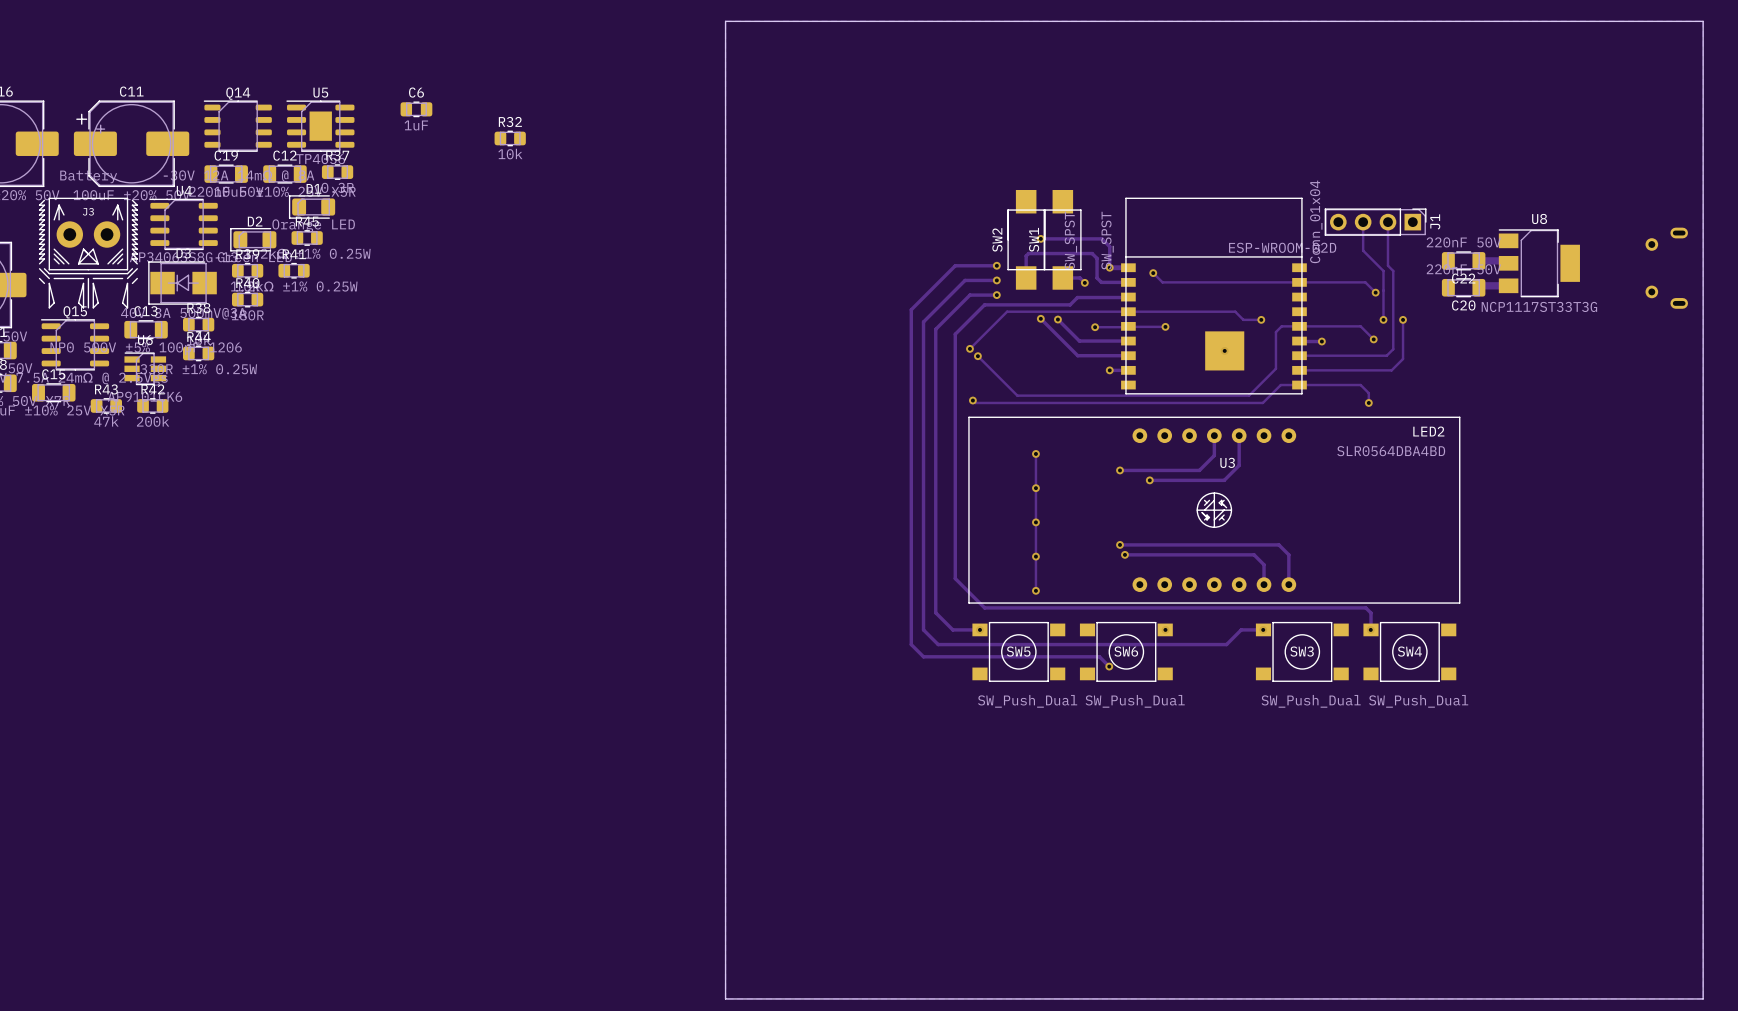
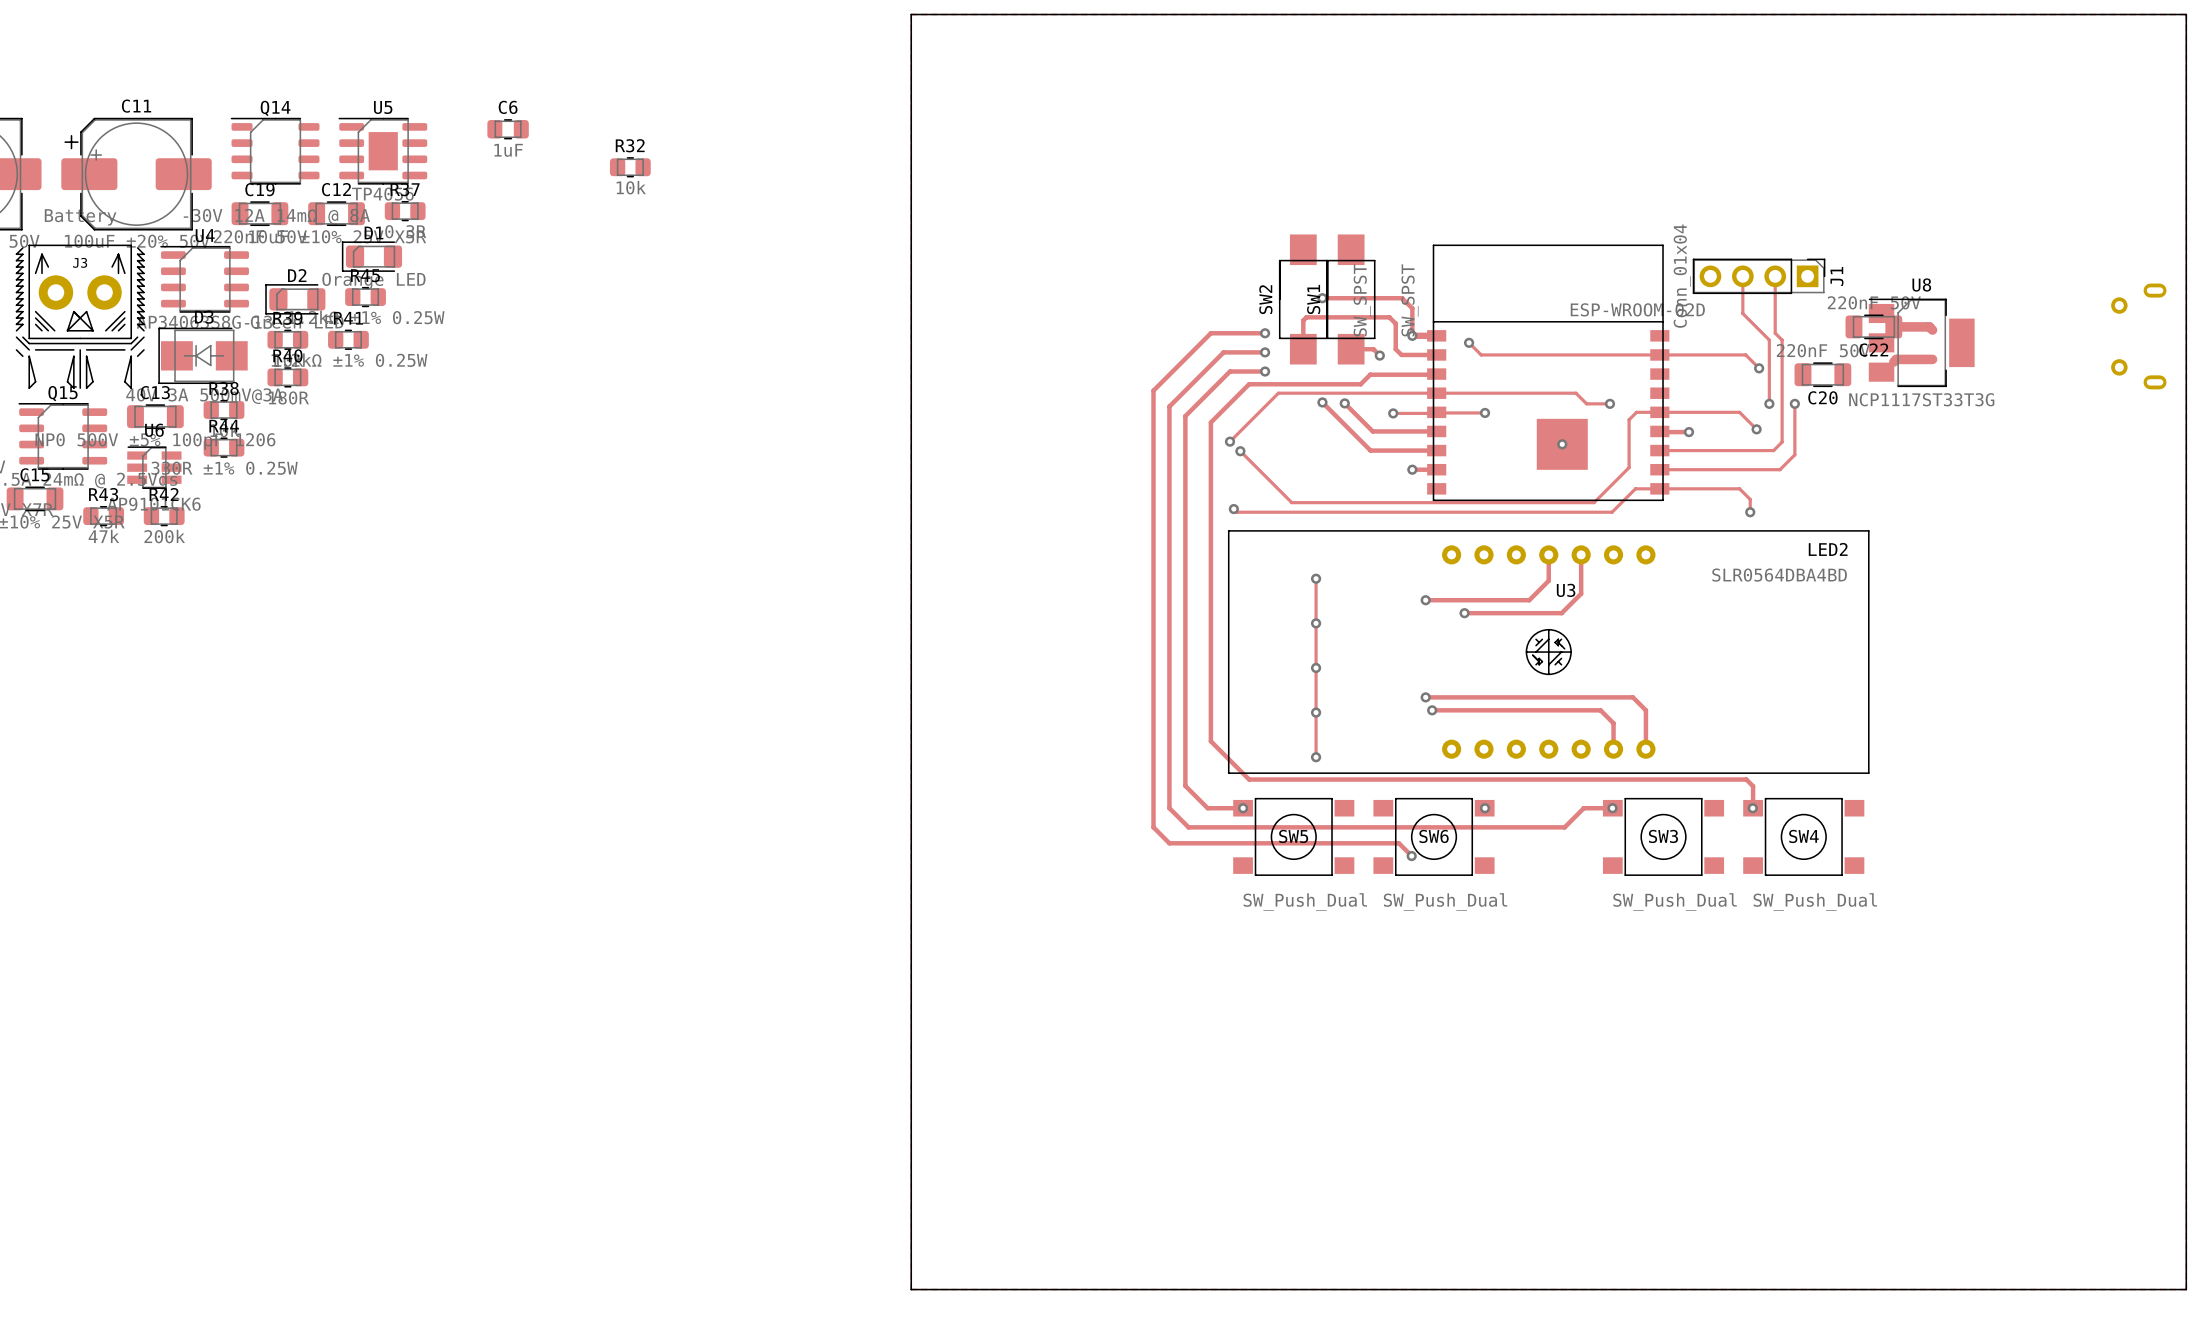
U8 position: (1539, 263) -> (1921, 342)
C20 position: (1463, 287) -> (1822, 374)

